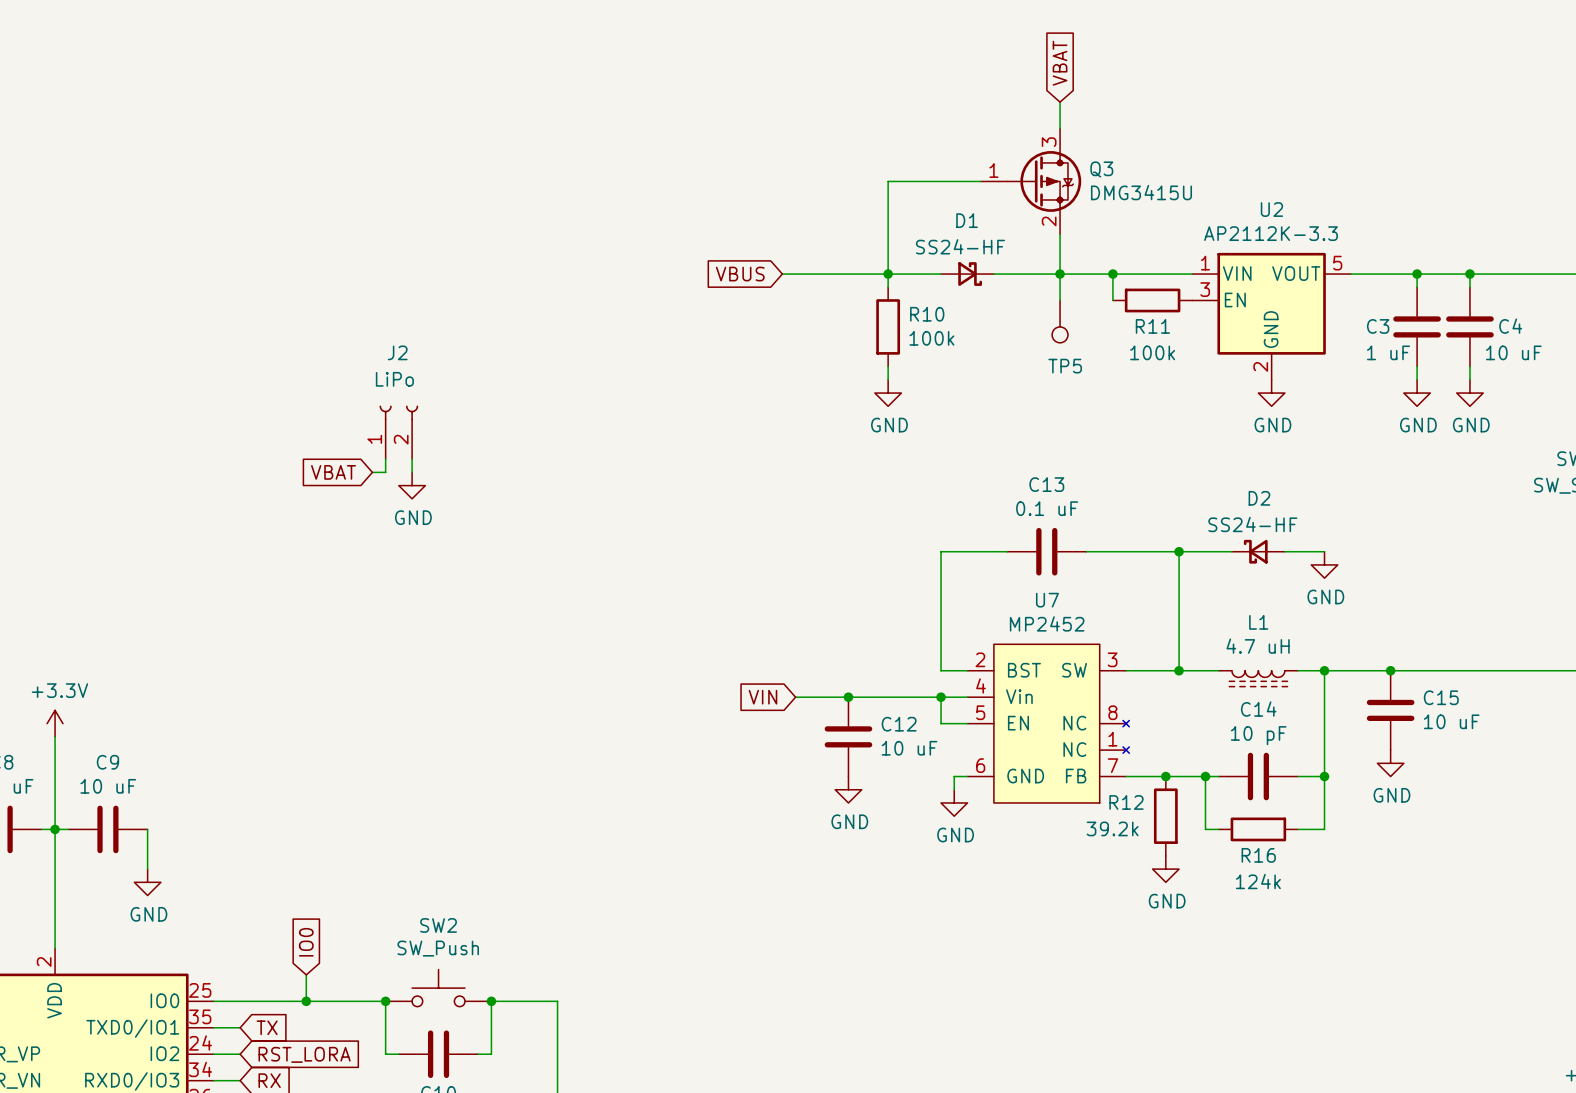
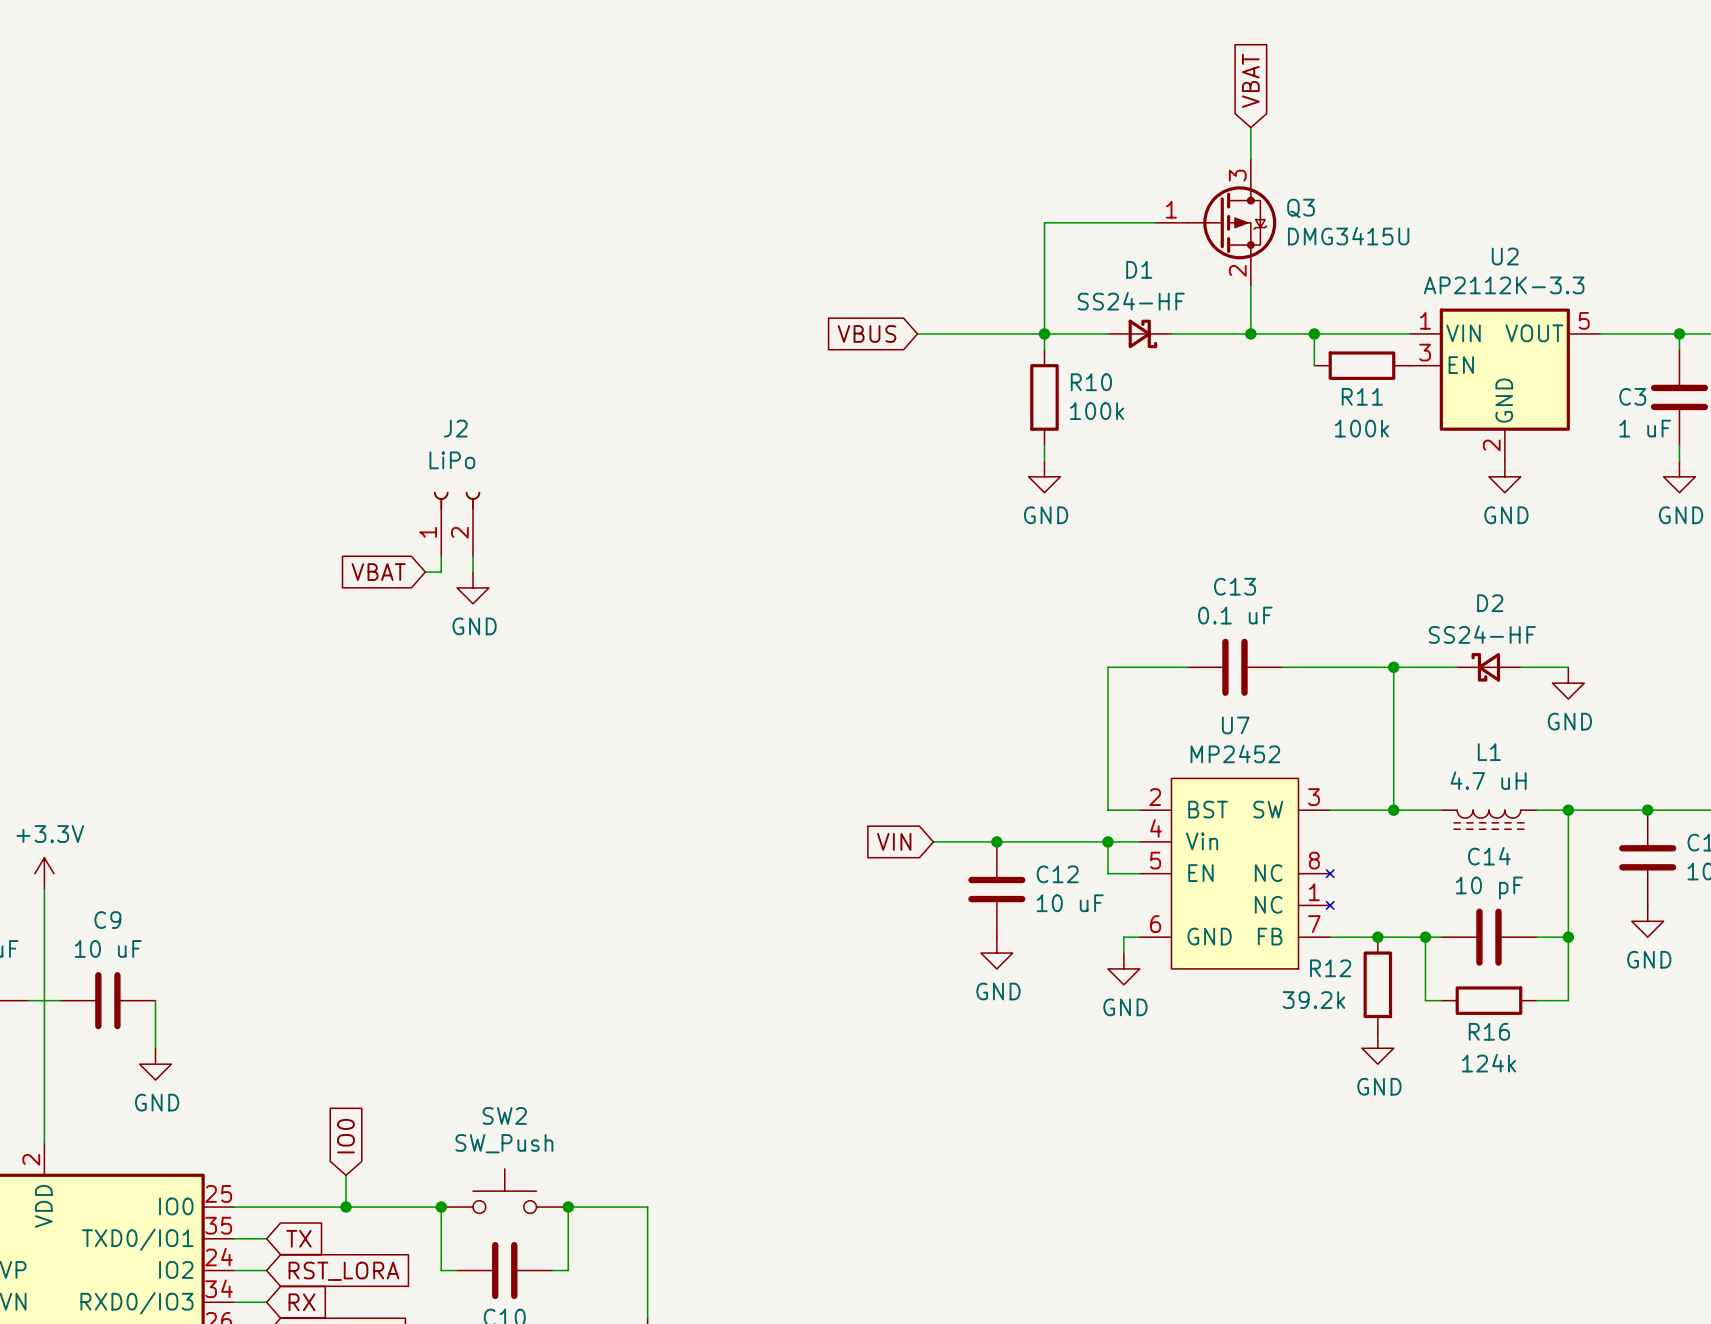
wire: (1060, 274) (1060, 300) -> none
TP5: (1060, 321) -> none
junction: (55, 829) -> none

